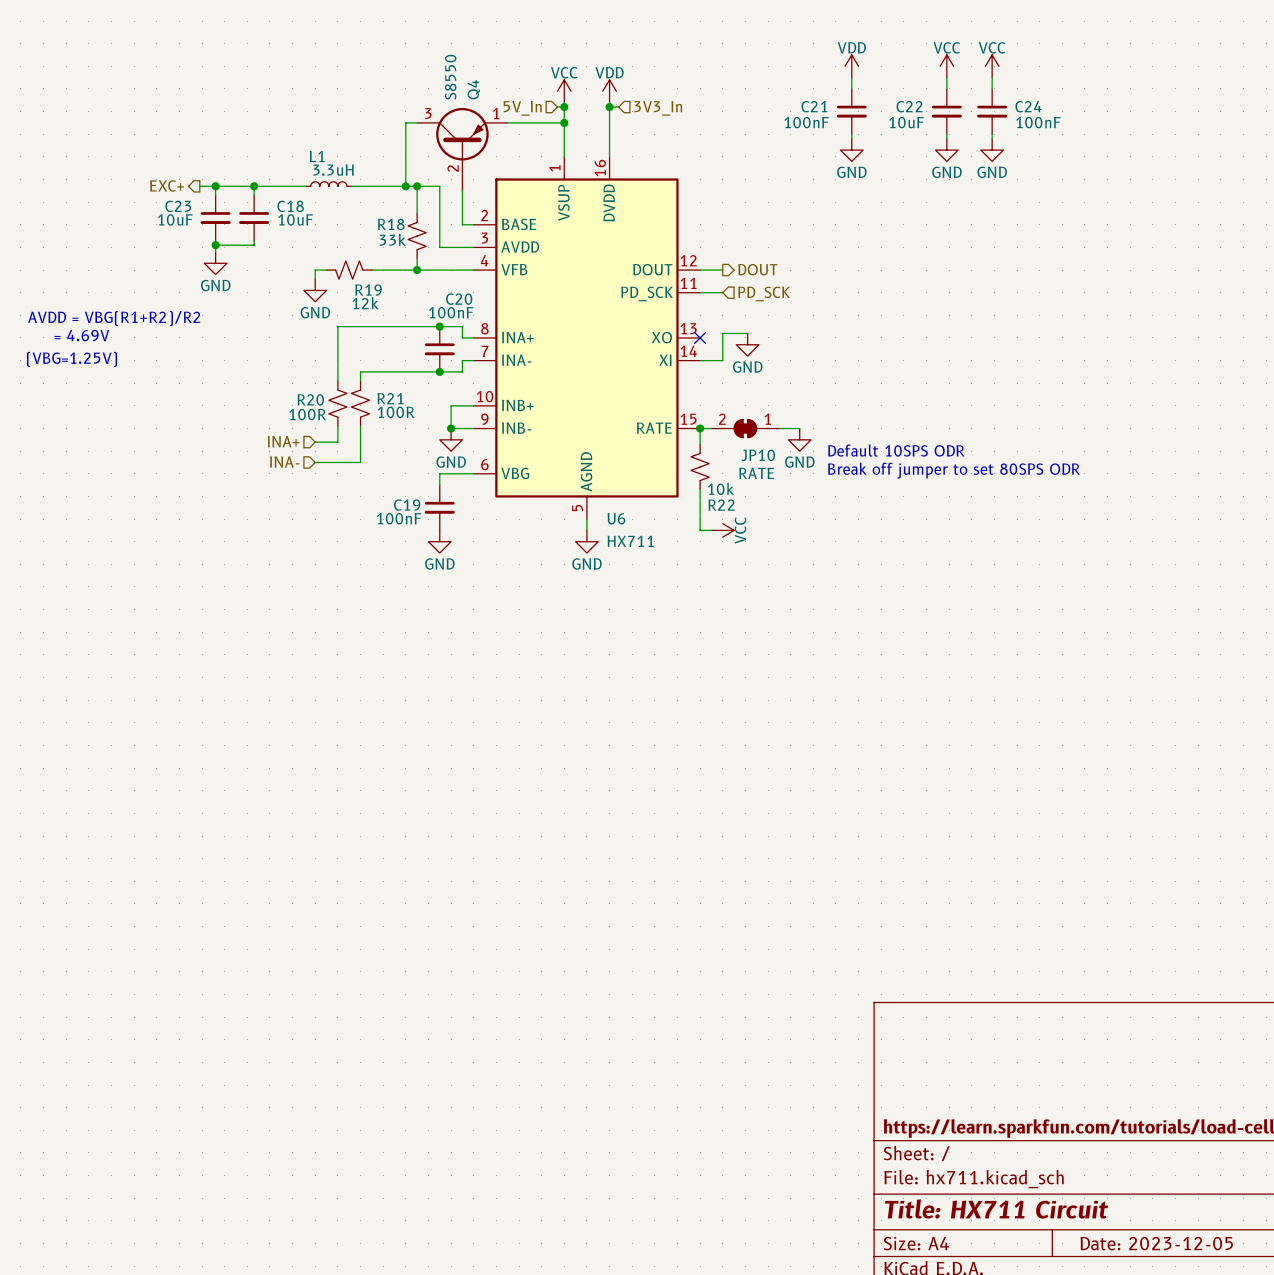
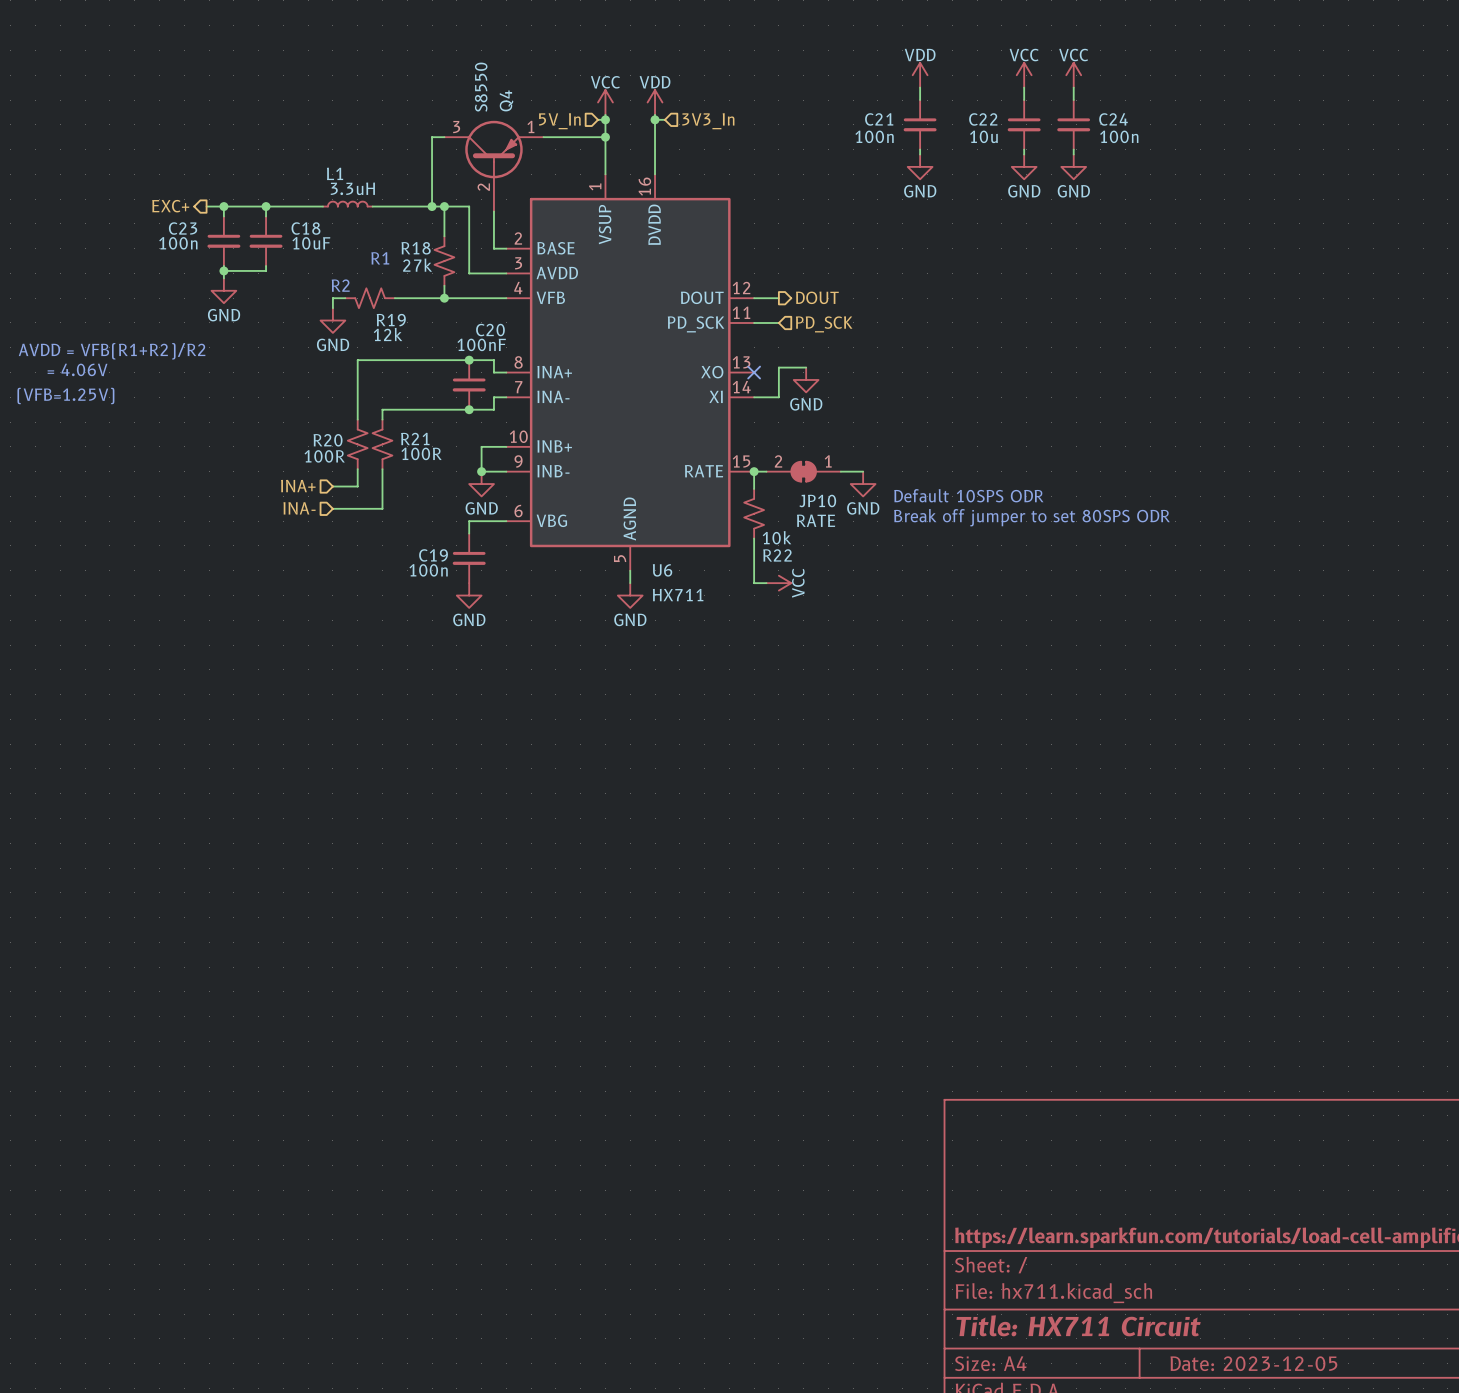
C21 value: 100nF (806, 122) -> 100n (874, 136)
C22 value: 10uF (906, 122) -> 10u (983, 136)
C24 value: 100nF (1038, 122) -> 100n (1119, 136)
C23 value: 10uF (175, 219) -> 100n (178, 243)
text: none -> R1 (380, 258)
R18 value: 33k (392, 239) -> 27k (417, 265)
text: none -> R2 (340, 285)
text: AVDD = VBG(R1+R2)/R2 (114, 318) -> AVDD = VFB(R1+R2)/R2 (112, 351)
text: = 4.69V (81, 335) -> = 4.06V (77, 369)
text: (VBG=1.25V) (72, 359) -> (VFB=1.25V) (65, 395)
C19 value: 100nF (399, 518) -> 100n (428, 570)

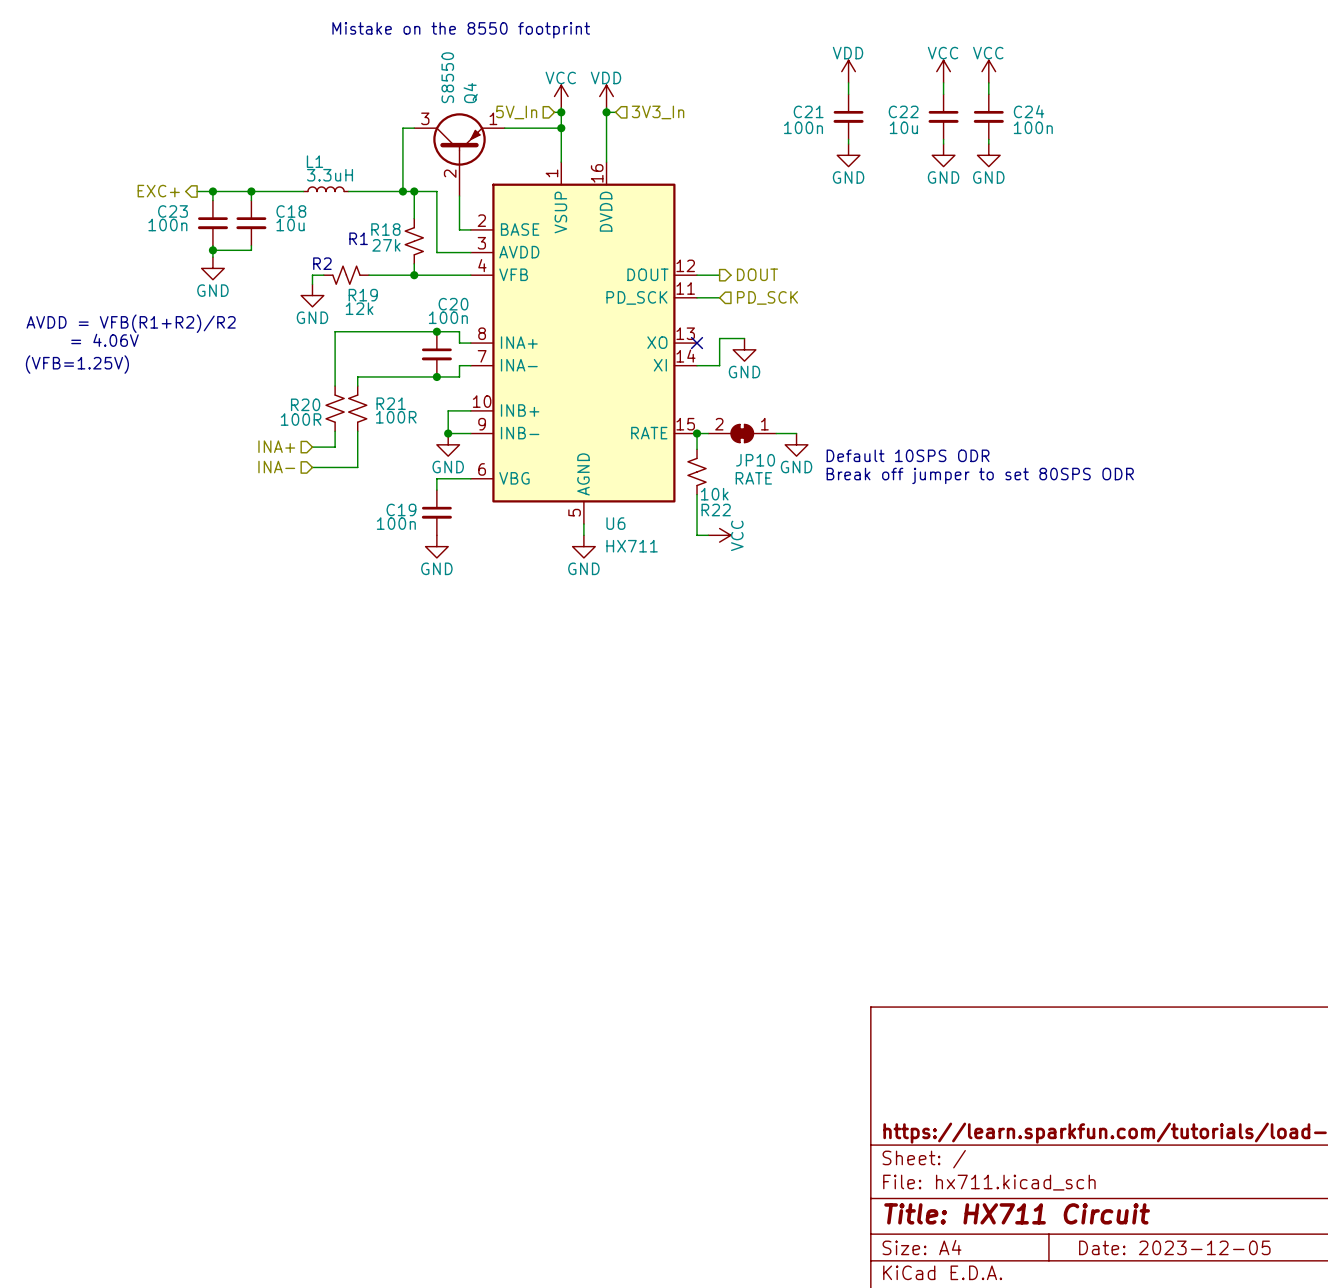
text: none -> Mistake on the 8550 footprint (461, 30)
C18 value: 10uF (311, 243) -> 10u (290, 225)
C20 value: 100nF (481, 344) -> 100n (448, 317)

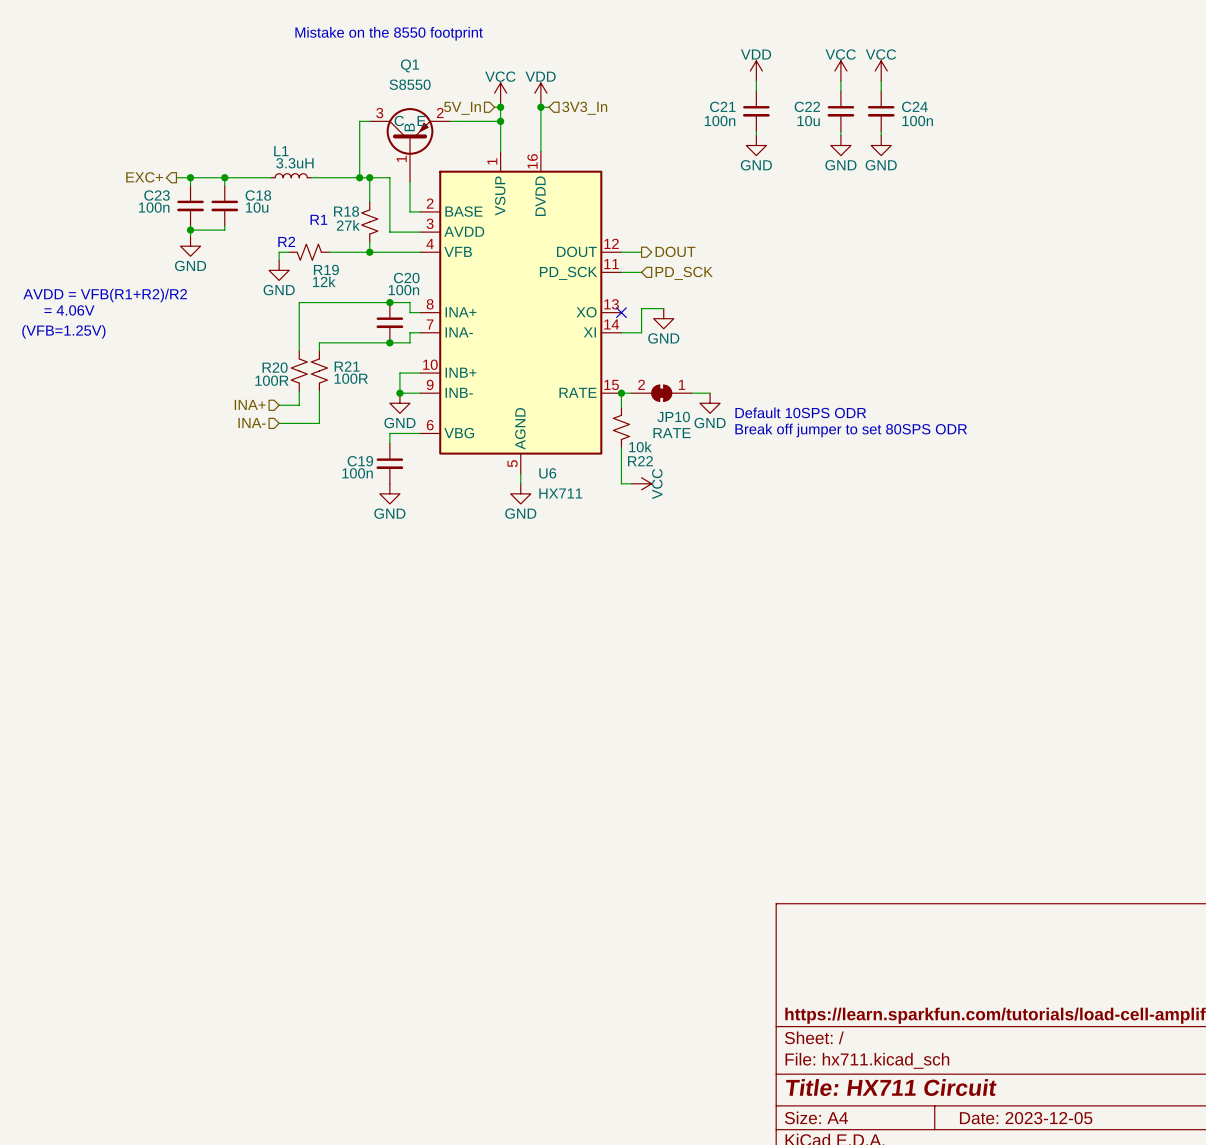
Q4: S8550 (459, 154) -> none
Q1: none -> S8550 (410, 144)

